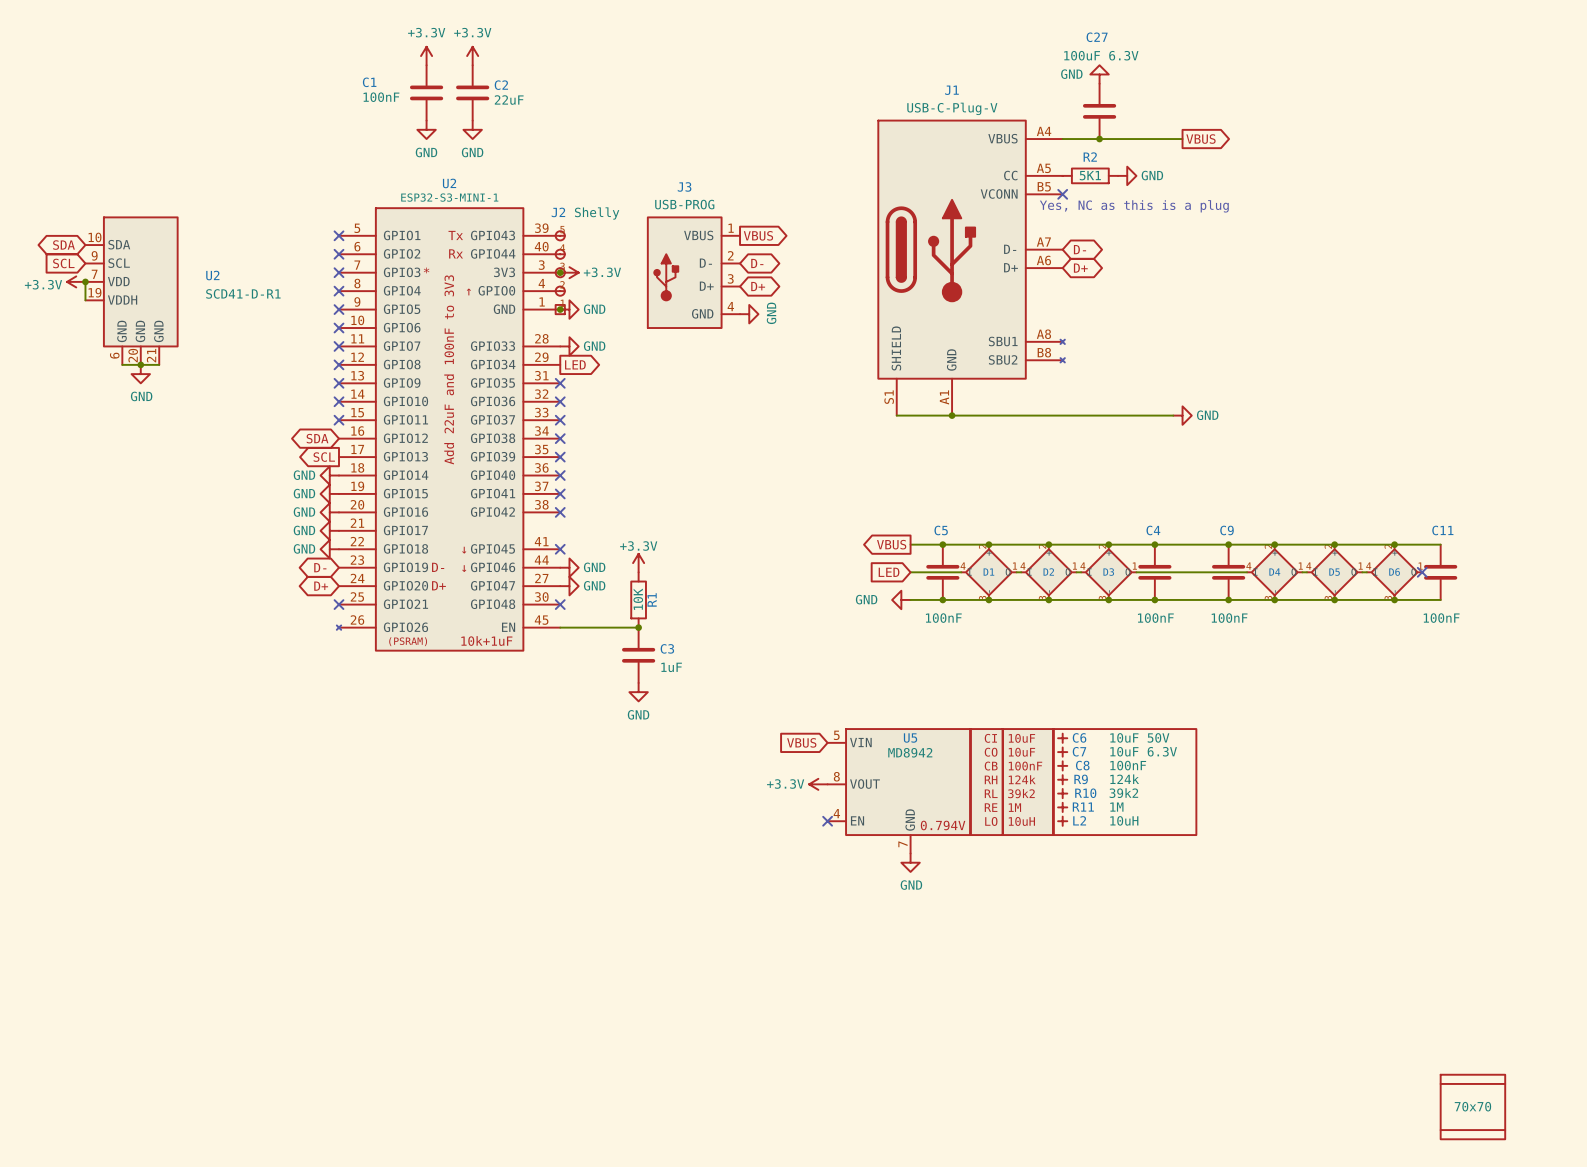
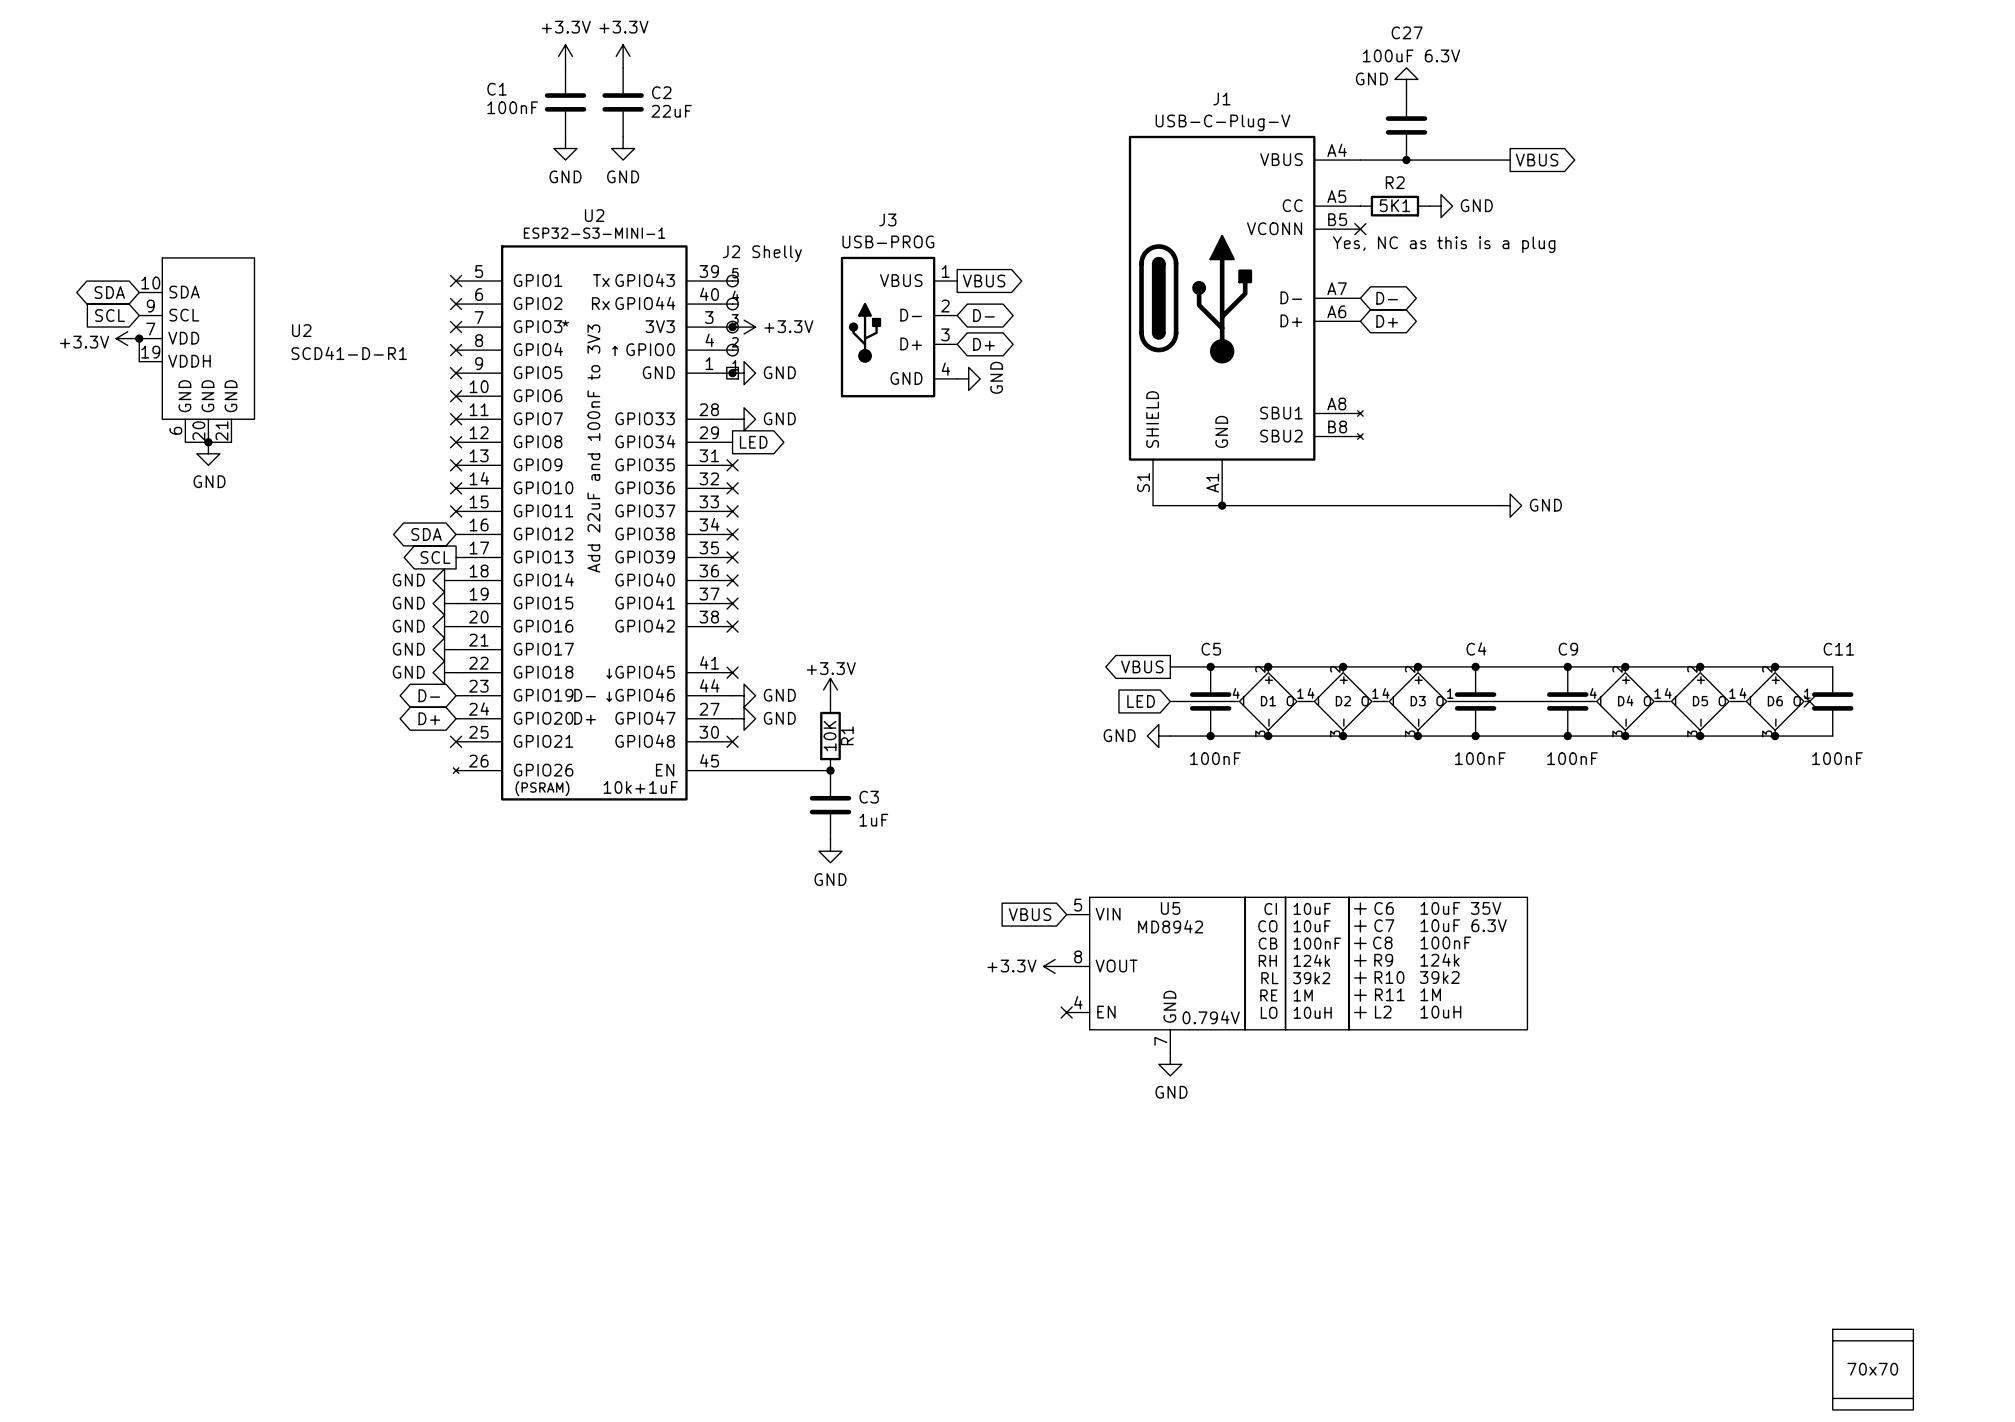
C6 value: 10uF 50V (1139, 737) -> 10uF 35V (1460, 908)

